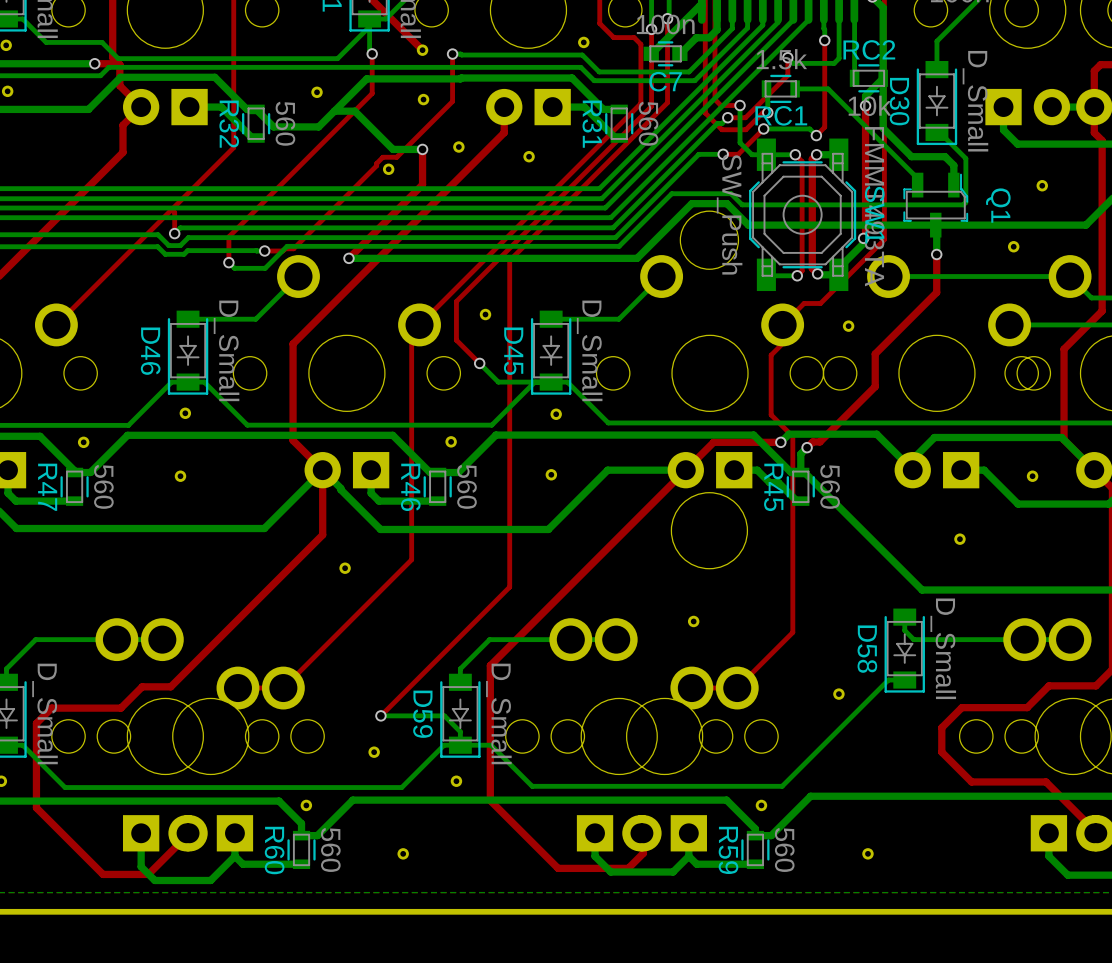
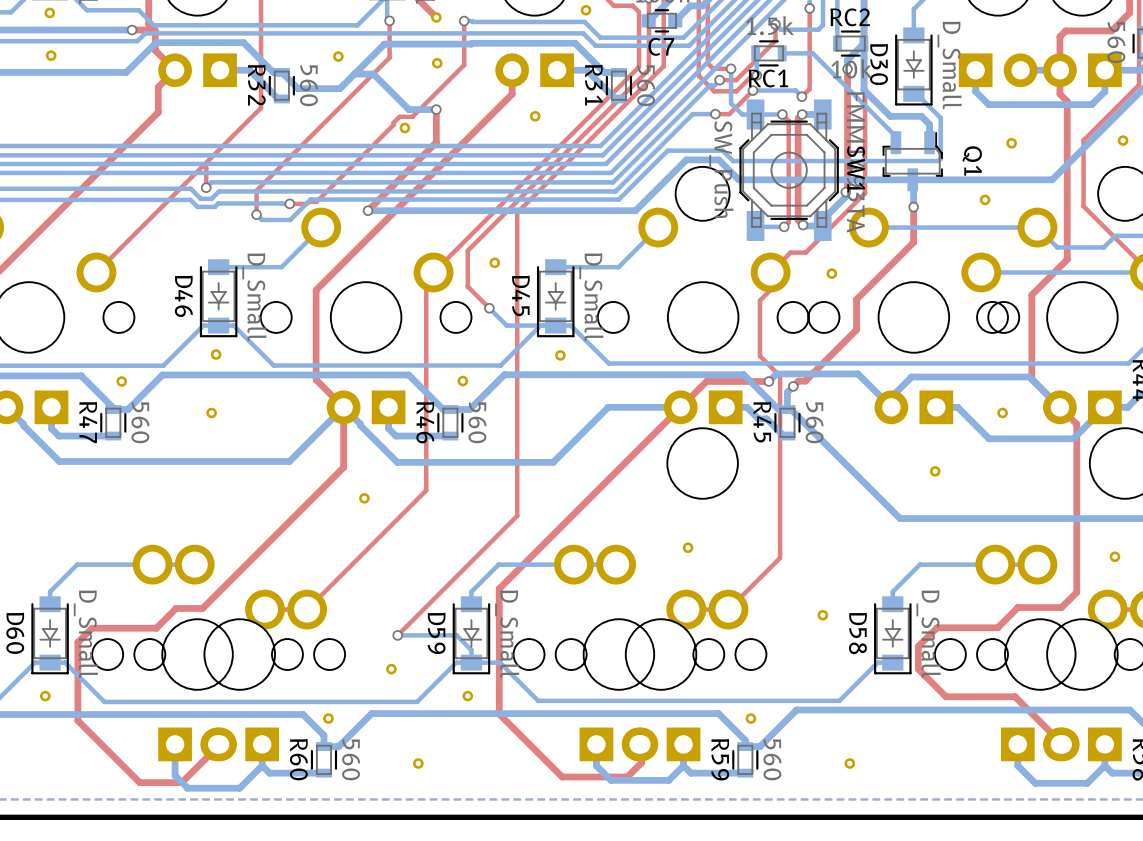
part: (458, 147) -> none
part: (551, 474) -> none
bottom track: (904, 617) (904, 630) (913, 639) (943, 639) -> (892, 604) (892, 591) (919, 564)
D58 position: (904, 650) -> (892, 635)
bottom track: (904, 680) (888, 680) (782, 786) -> (892, 662) (877, 662) (839, 700) (770, 700)

